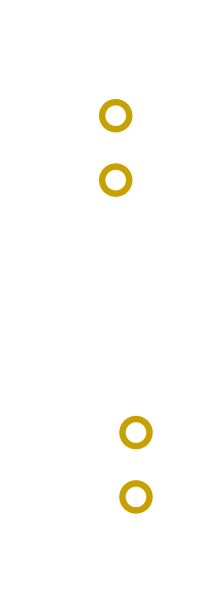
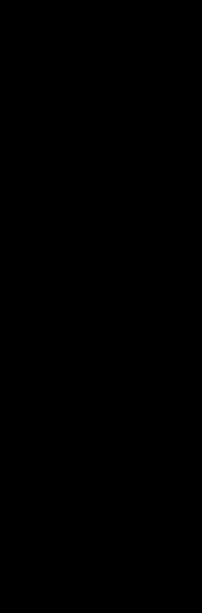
part: (115, 147) -> none
part: (135, 464) -> none

